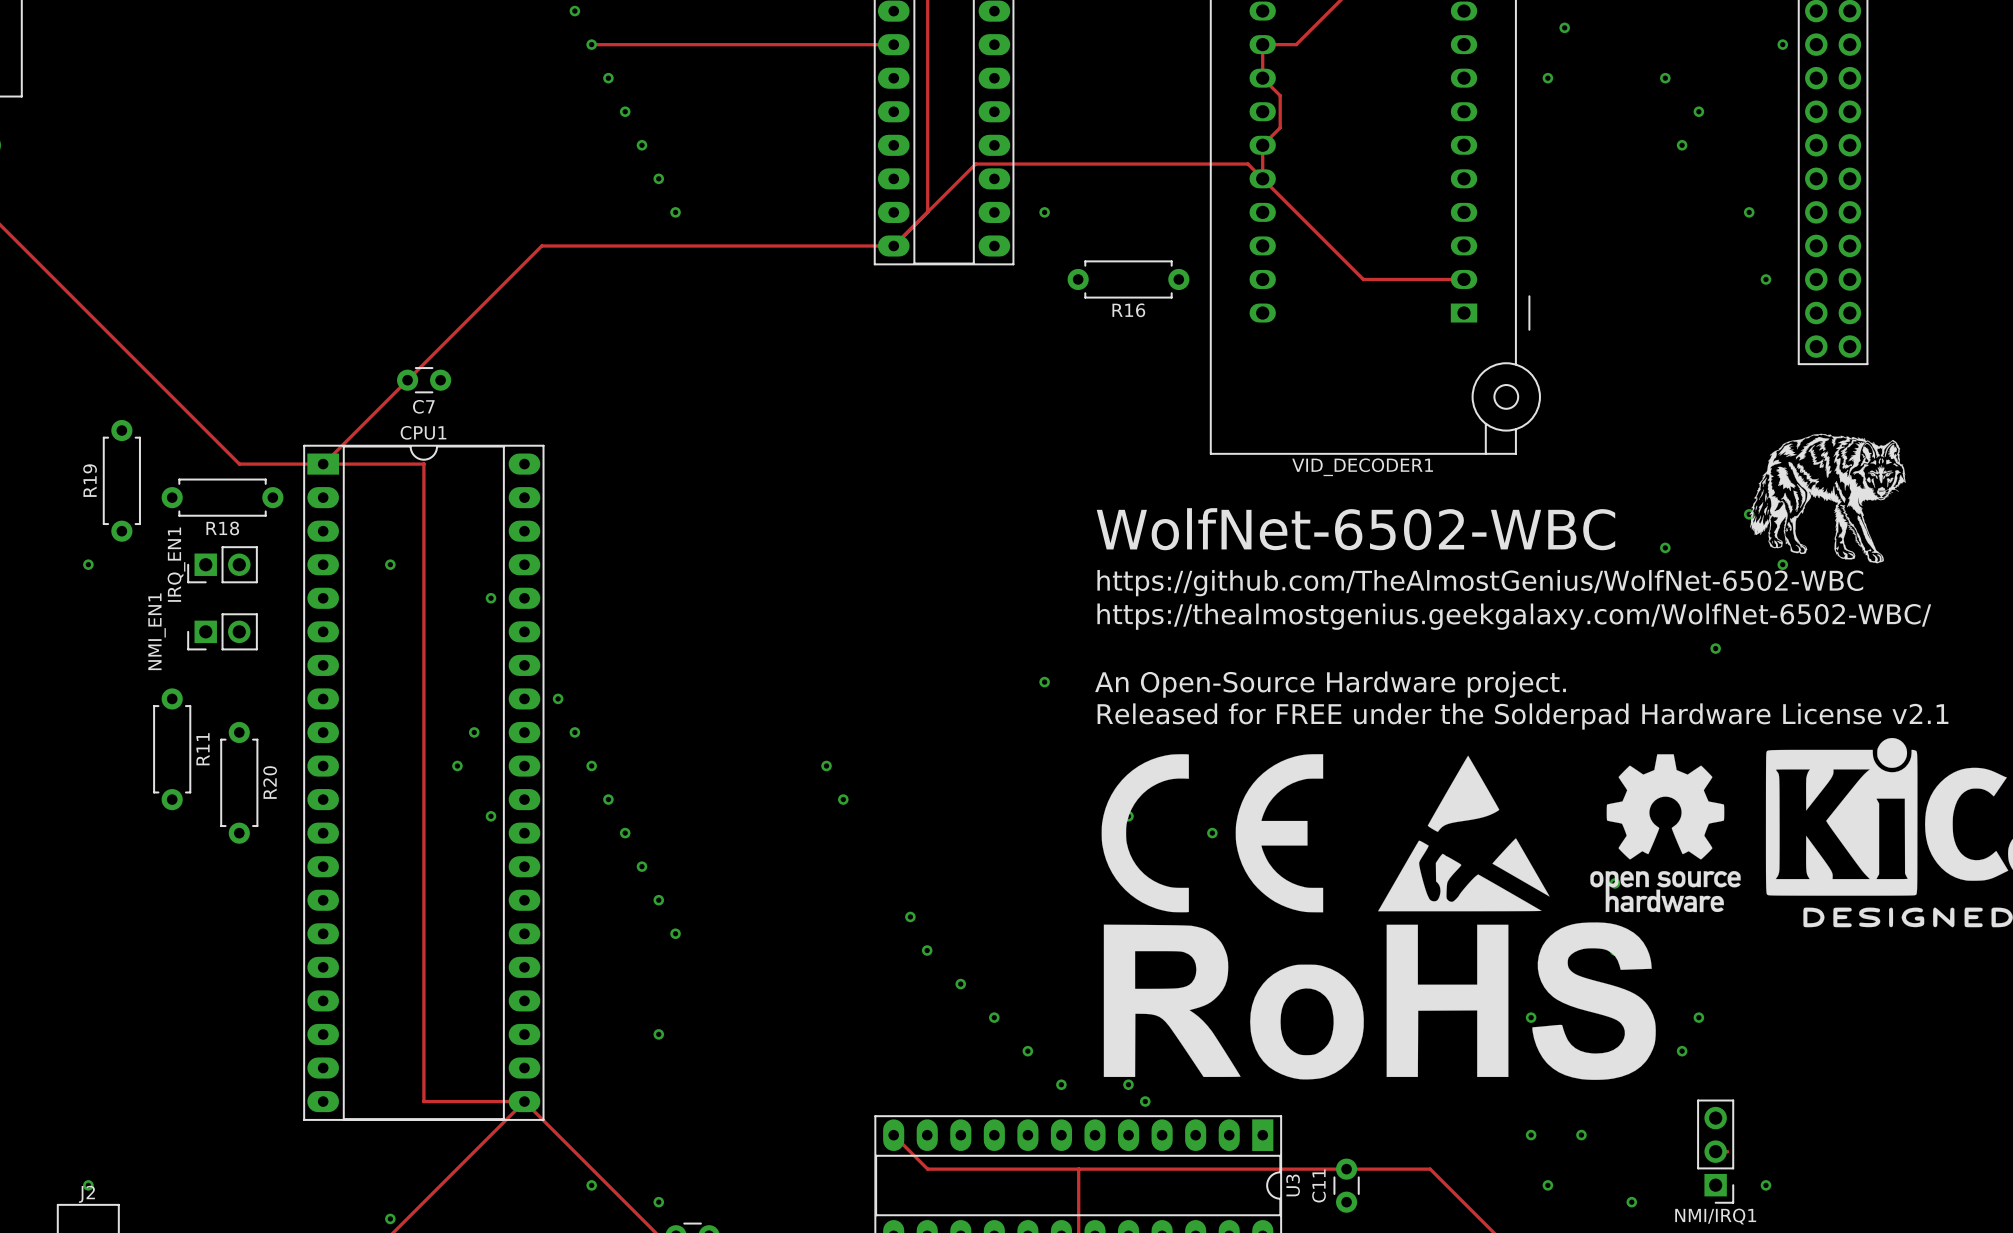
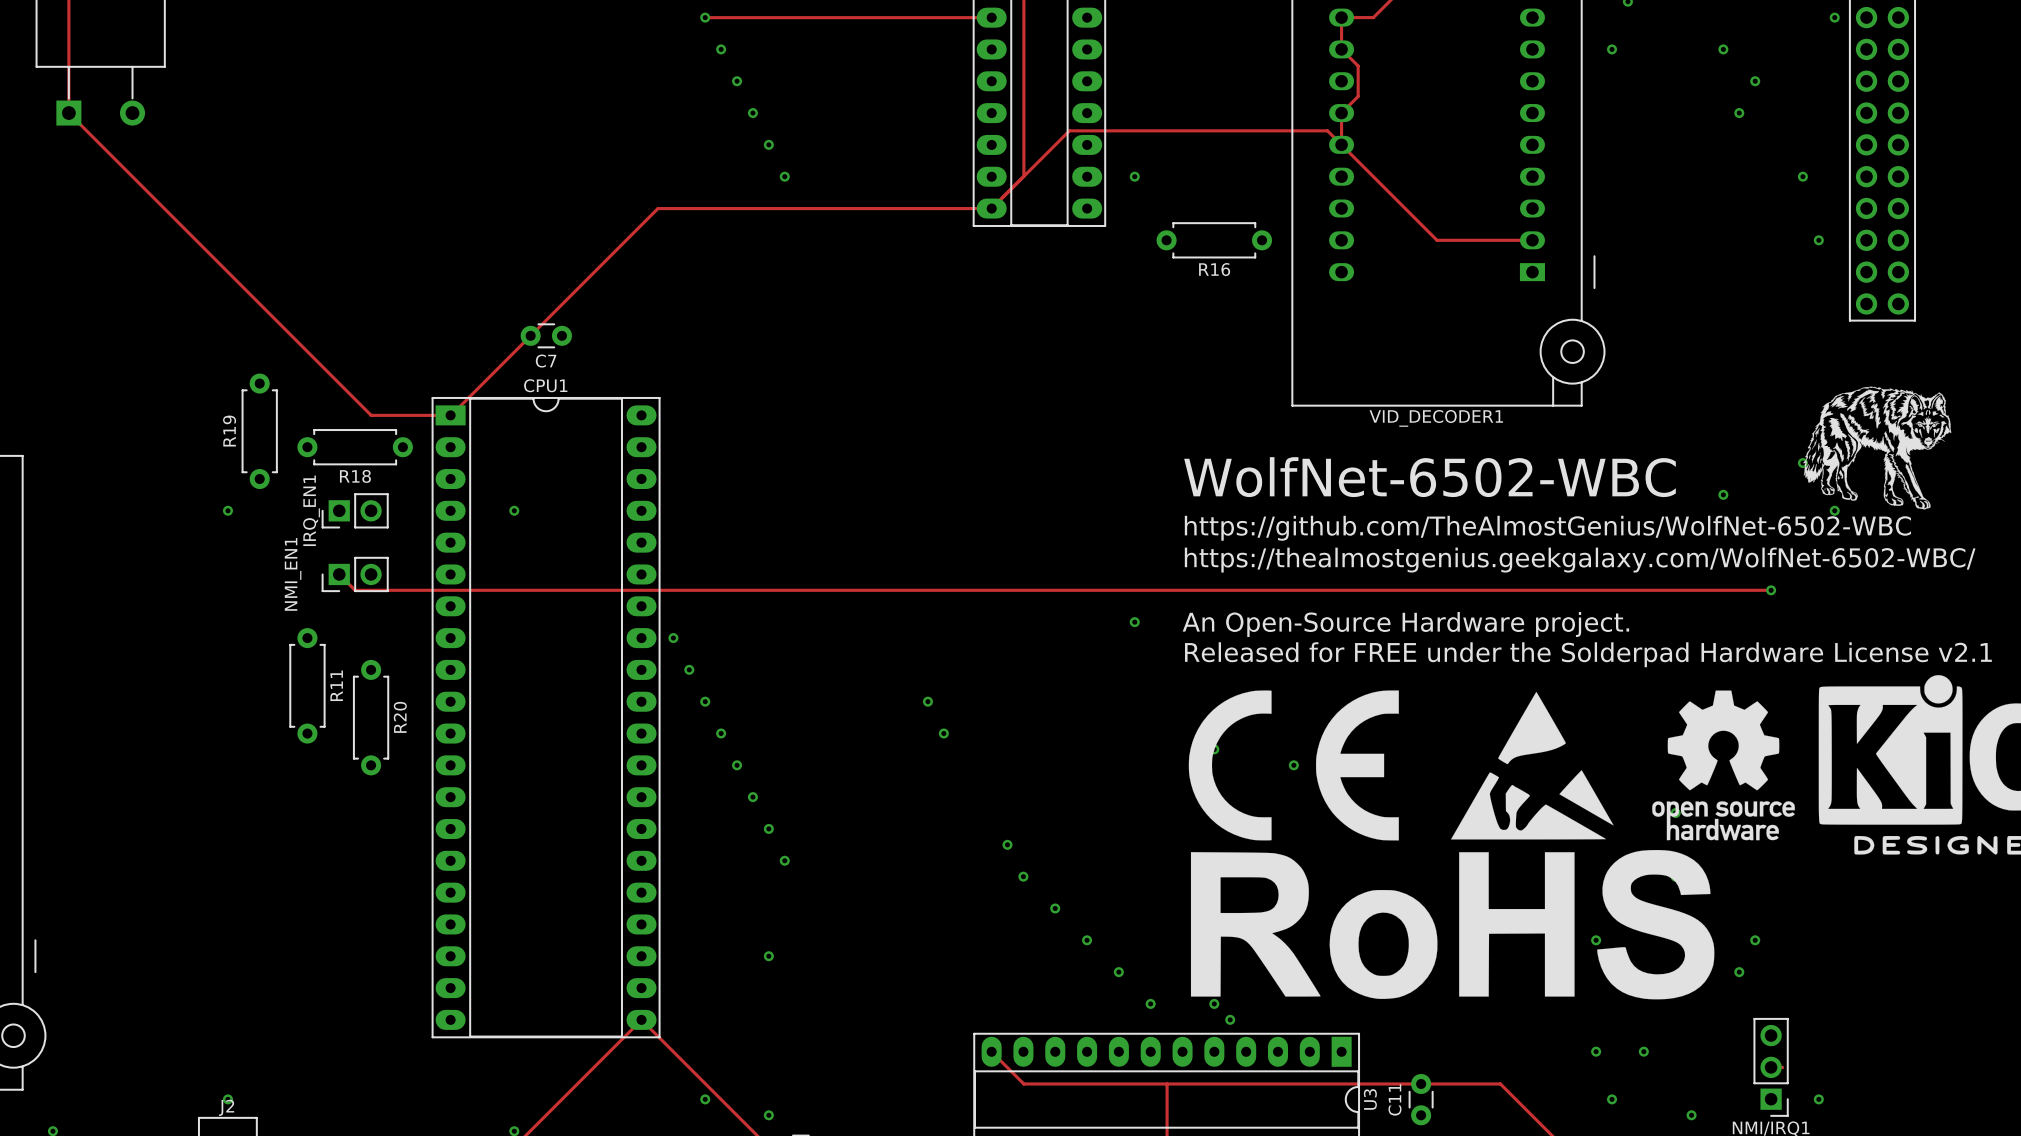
track: (323, 464) (423, 464) -> none
track: (423, 464) (423, 1101) -> none
via: (491, 598) -> none
track: none -> (339, 574) (355, 590) (1771, 590)
via: (474, 732) -> none
via: (457, 765) -> none
via: (491, 816) -> none
track: (423, 1101) (524, 1101) -> none

